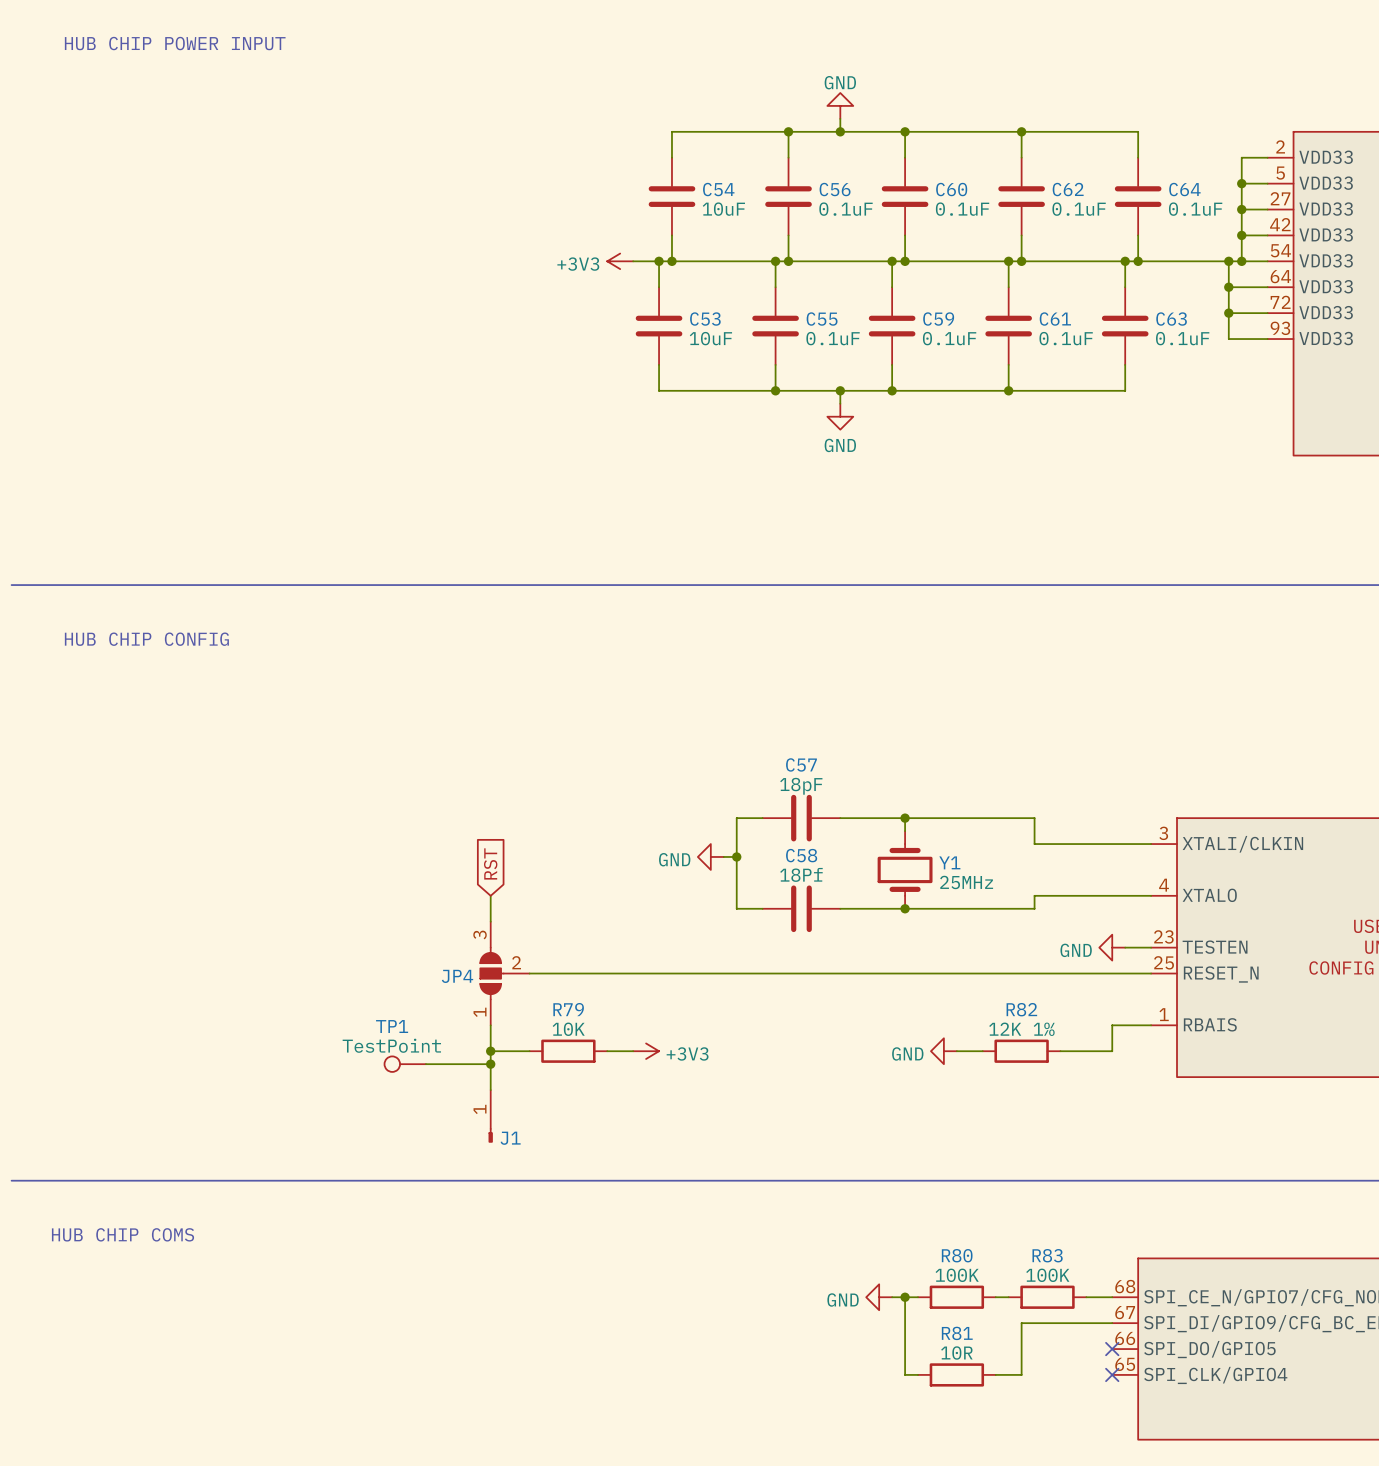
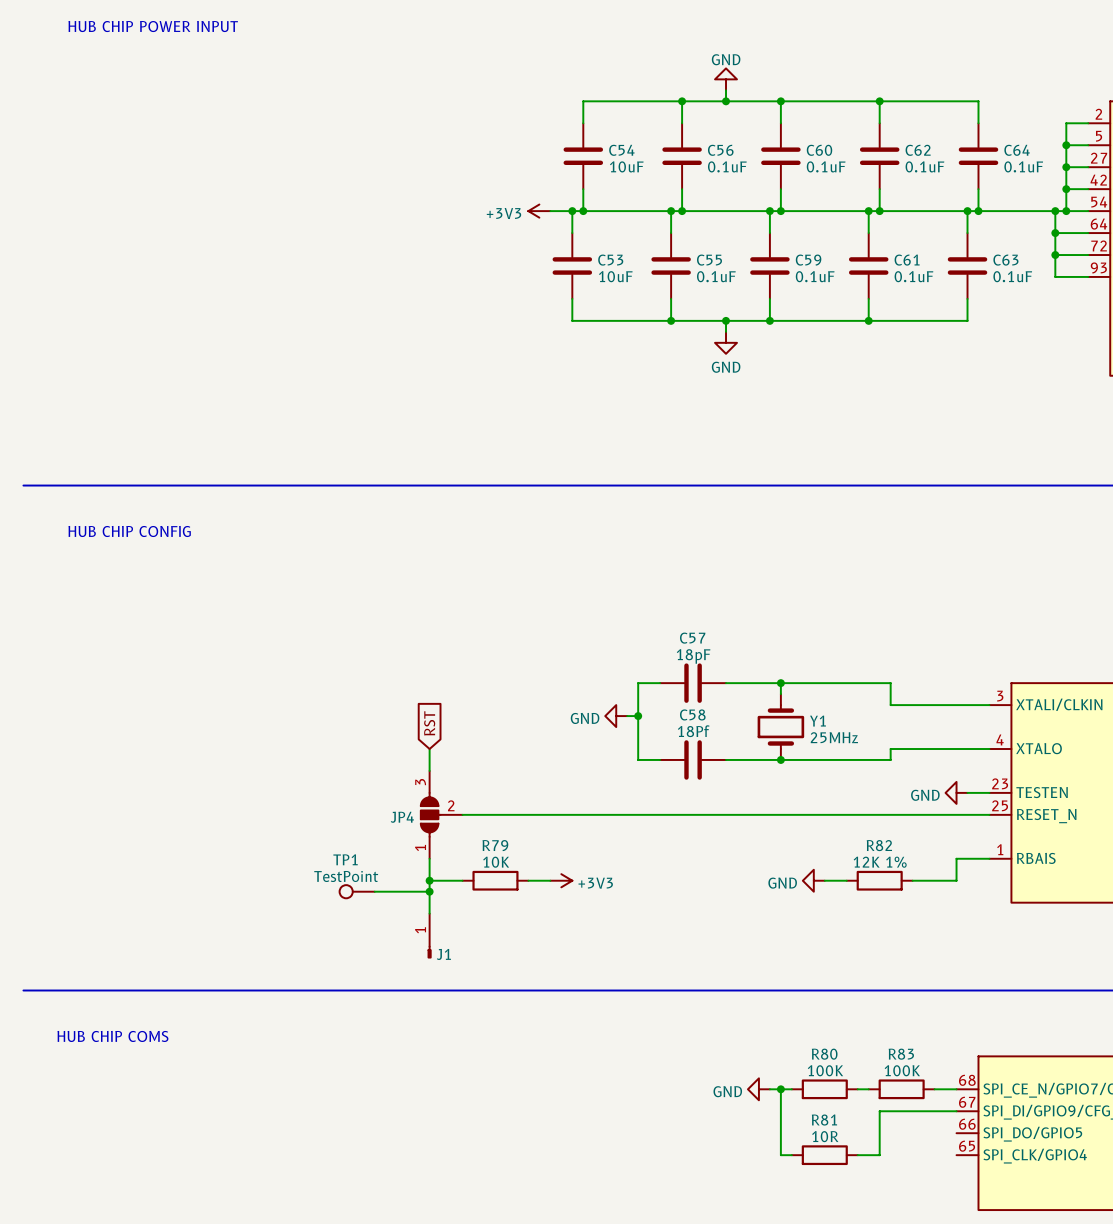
no-connect mark: (1112, 1349) -> none
no-connect mark: (1112, 1374) -> none

